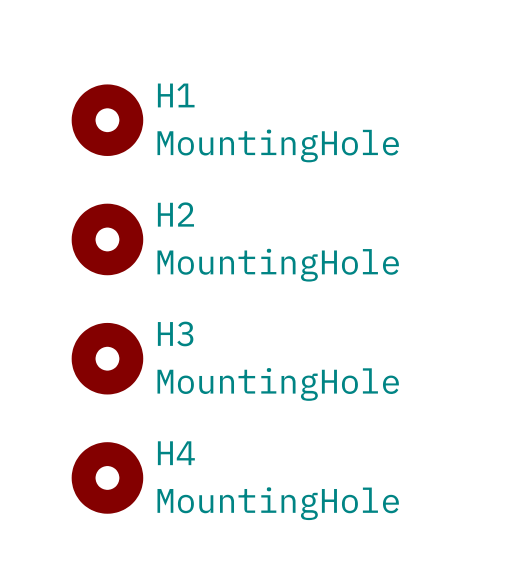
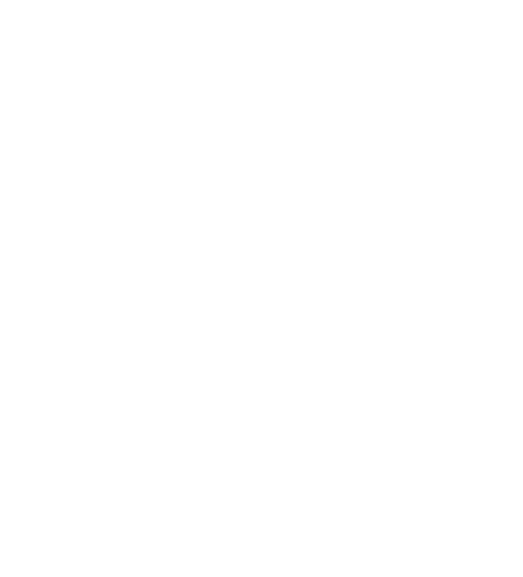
H1: MountingHole (107, 120) -> none
H2: MountingHole (107, 239) -> none
H3: MountingHole (107, 358) -> none
H4: MountingHole (107, 477) -> none

